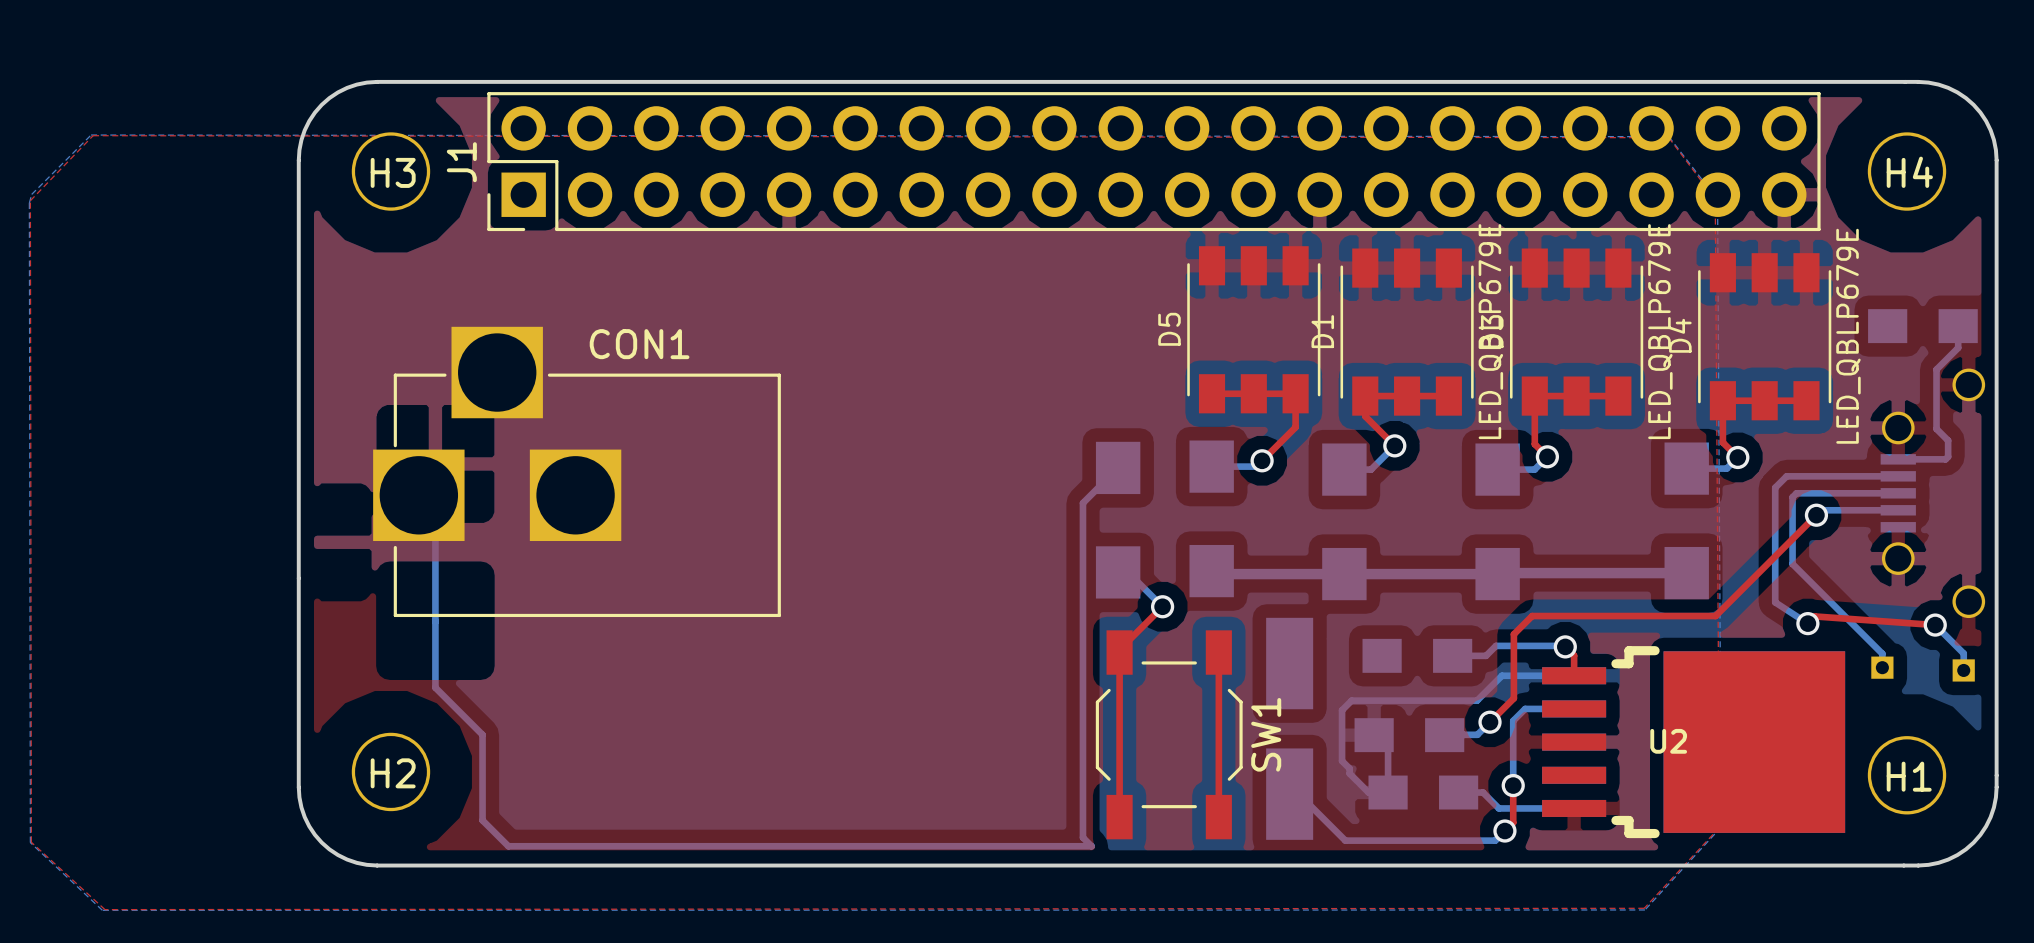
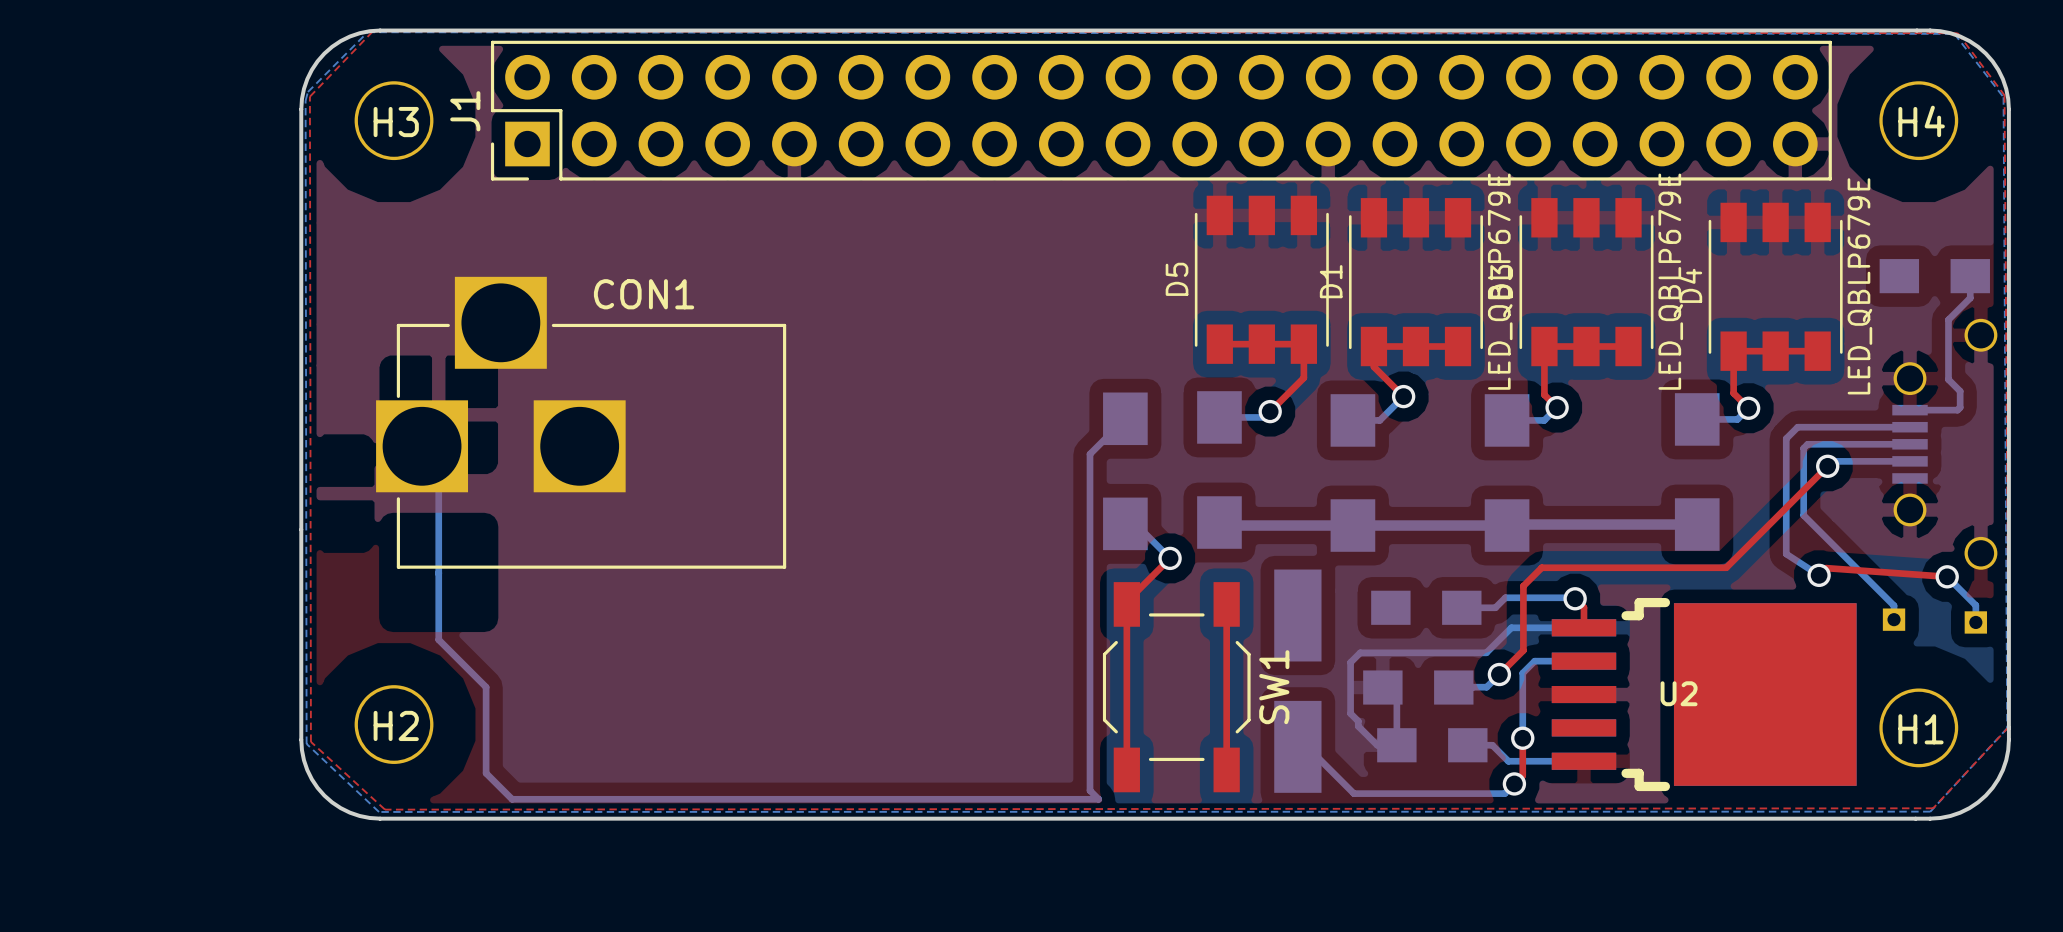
bottom zone outline: (91, 135) (1668, 136) (1717, 199) (1721, 827) (1644, 909) (102, 910) (30, 842) (29, 203) (31, 194) (91, 135) -> (367, 32) (1954, 33) (2003, 97) (2007, 728) (1930, 811) (379, 811) (306, 743) (305, 100) (307, 91) (367, 32)
top zone outline: (93, 135) (30, 200) (31, 842) (105, 909) (1644, 908) (1719, 827) (1715, 199) (1668, 137) (93, 135) -> (373, 31) (309, 96) (310, 741) (385, 809) (1933, 808) (2008, 726) (2004, 95) (1957, 33) (373, 31)

